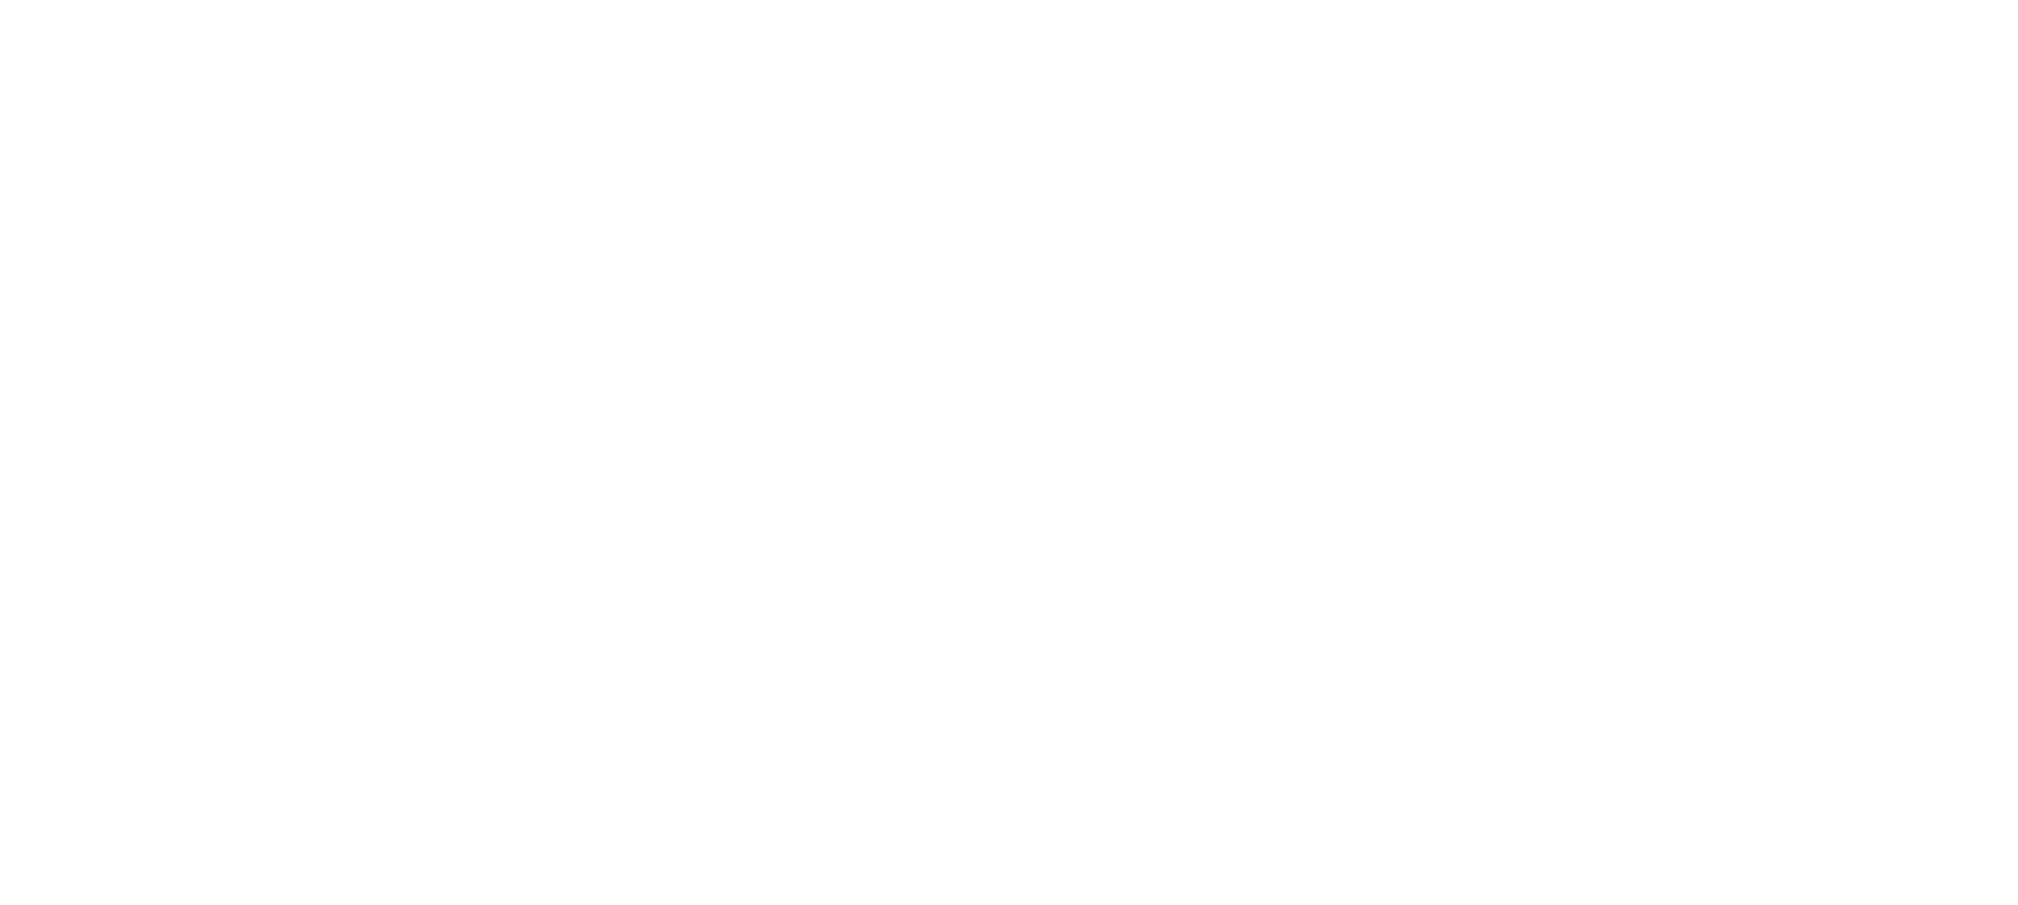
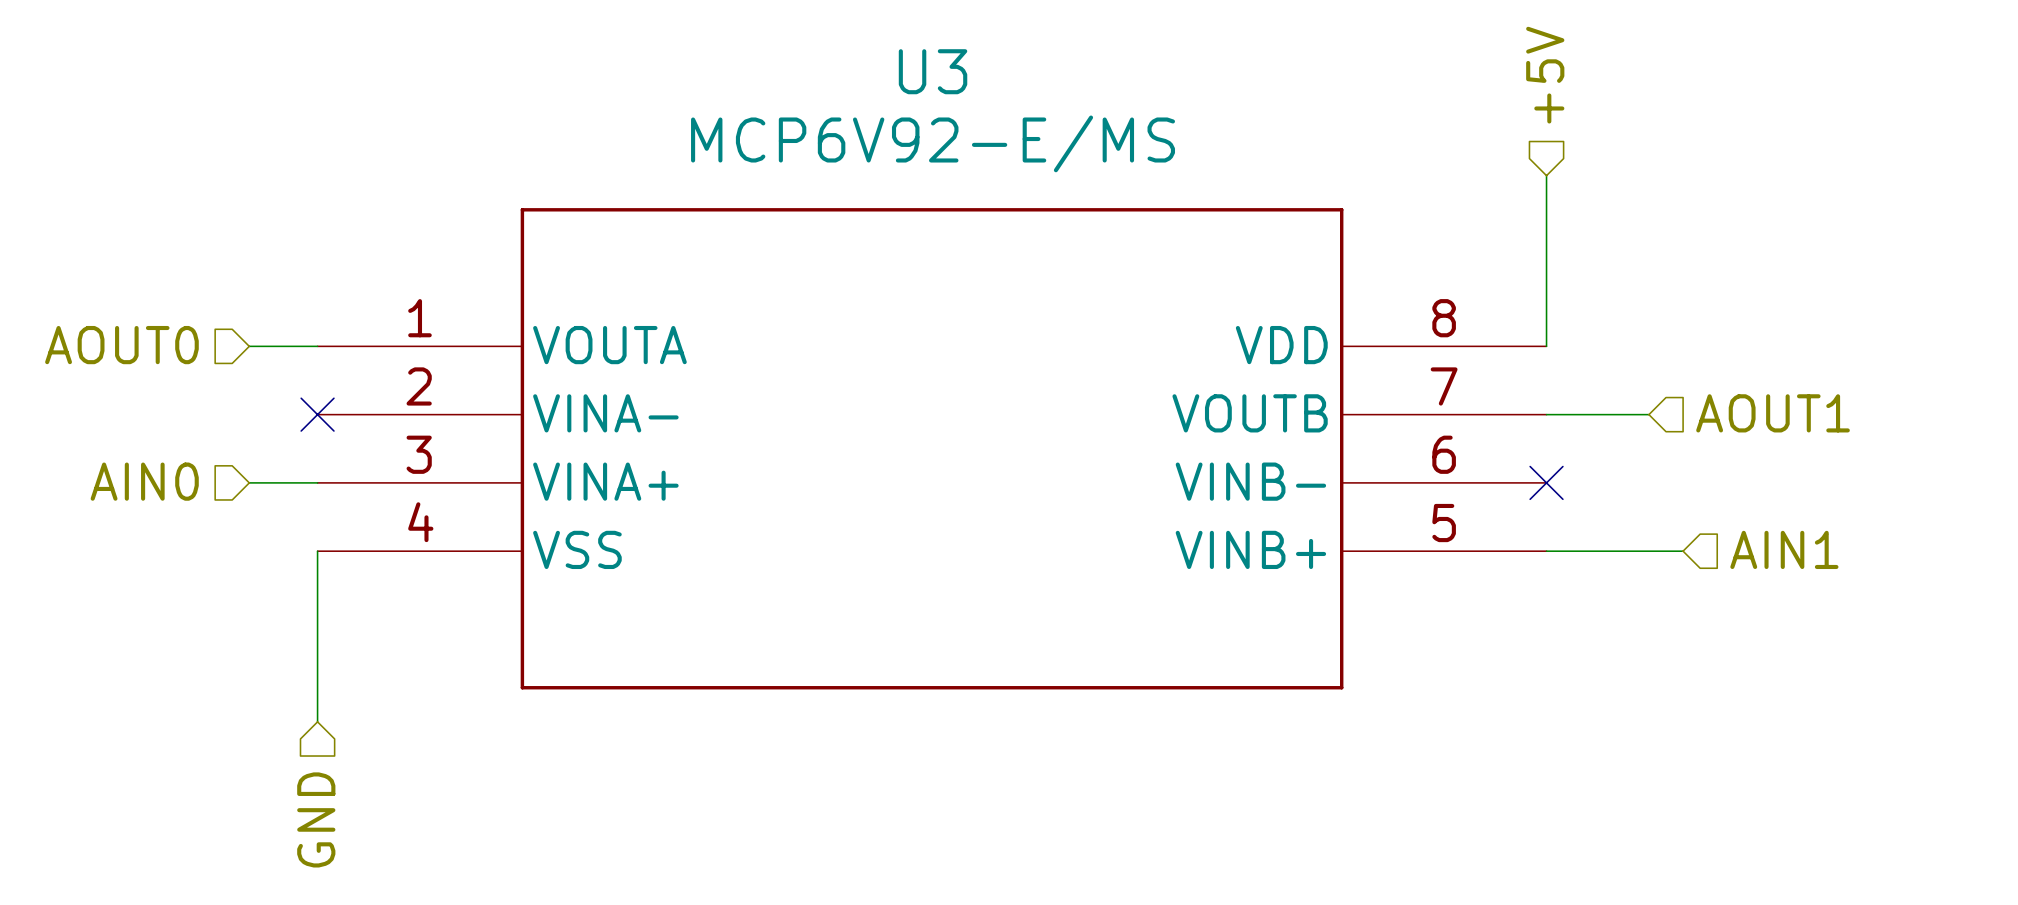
hierarchical label: none -> +5V (1545, 75)
wire: none -> (1546, 175) (1546, 346)
hierarchical label: none -> AOUT0 (121, 345)
wire: none -> (249, 346) (317, 346)
hierarchical label: none -> AOUT1 (1773, 413)
no-connect mark: none -> (317, 414)
wire: none -> (1546, 414) (1648, 414)
U3: none -> MCP6V92-E/MS (932, 448)
hierarchical label: none -> AIN0 (144, 481)
wire: none -> (249, 482) (317, 482)
no-connect mark: none -> (1546, 482)
hierarchical label: none -> AIN1 (1784, 549)
wire: none -> (317, 551) (317, 721)
wire: none -> (1546, 551) (1683, 551)
hierarchical label: none -> GND (316, 819)

